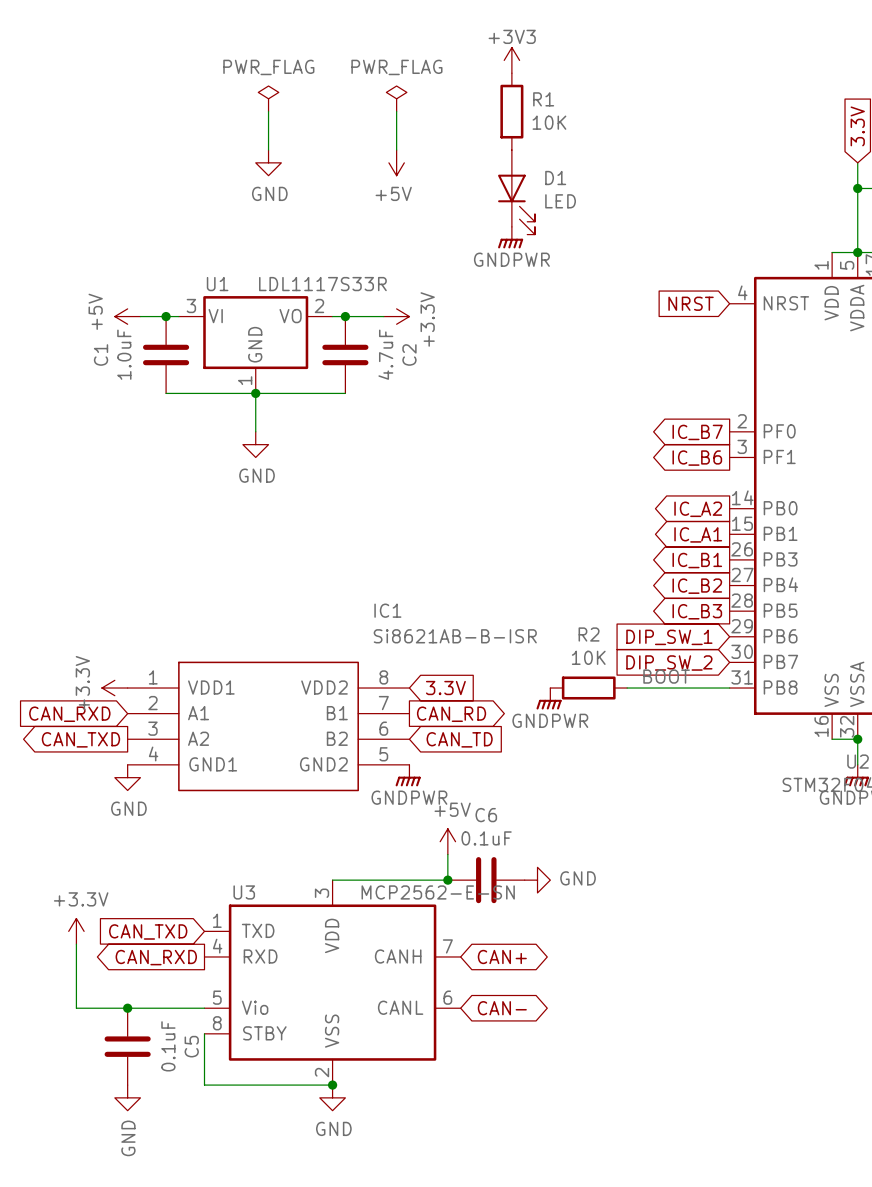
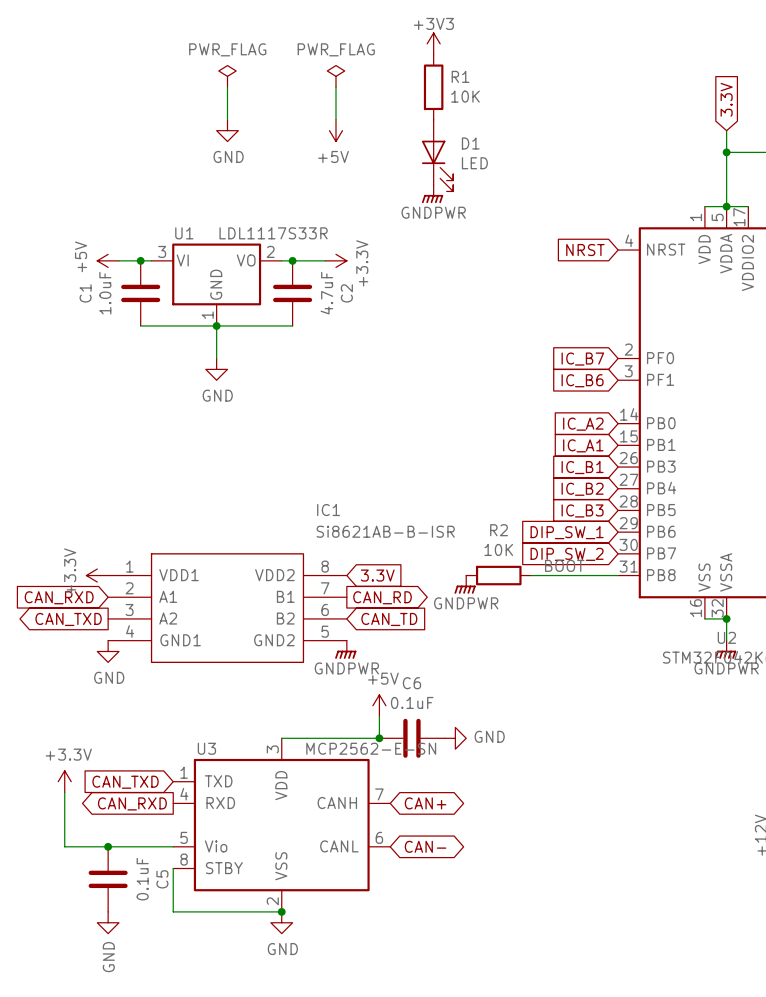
global label shape: output (697, 432) -> input (582, 359)
global label shape: output (697, 458) -> input (582, 380)
global label shape: output (698, 509) -> input (583, 424)
global label shape: output (698, 534) -> input (583, 445)
global label shape: output (697, 560) -> input (582, 467)
global label shape: output (697, 586) -> input (582, 489)
global label shape: output (697, 611) -> input (582, 510)

